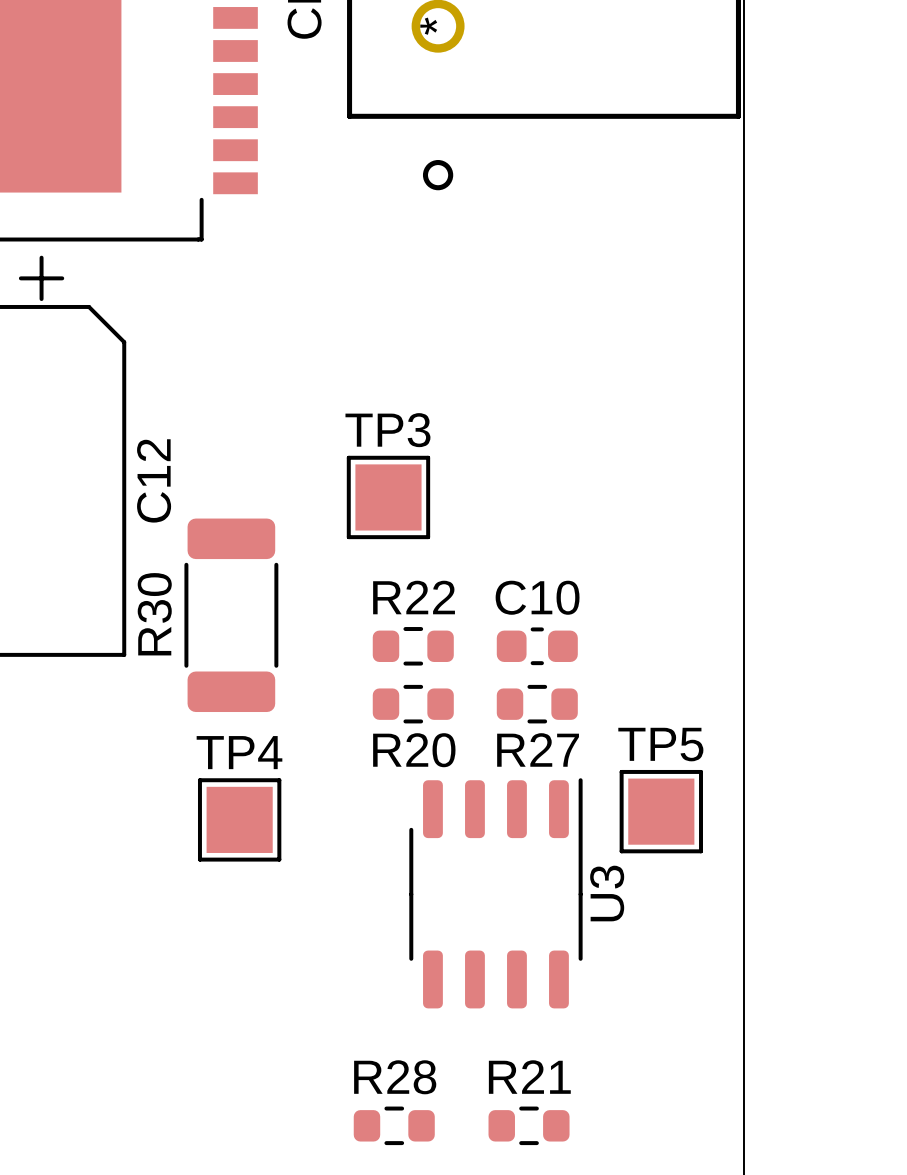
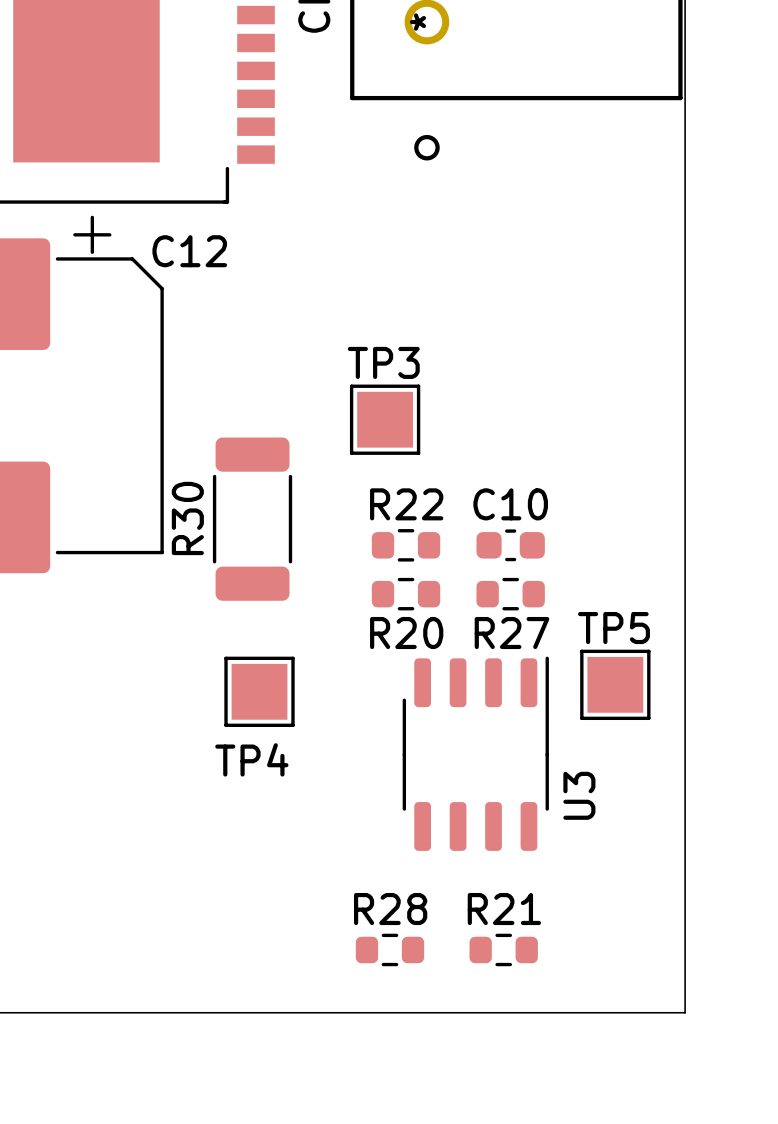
C12 name rotation: 0° (154, 480) -> 90° clockwise (189, 251)
C12 name position: C12 (154, 480) -> C12 (189, 251)
TP4 name position: TP4 (239, 752) -> TP4 (251, 759)
U3 name position: U3 (607, 893) -> U3 (579, 795)

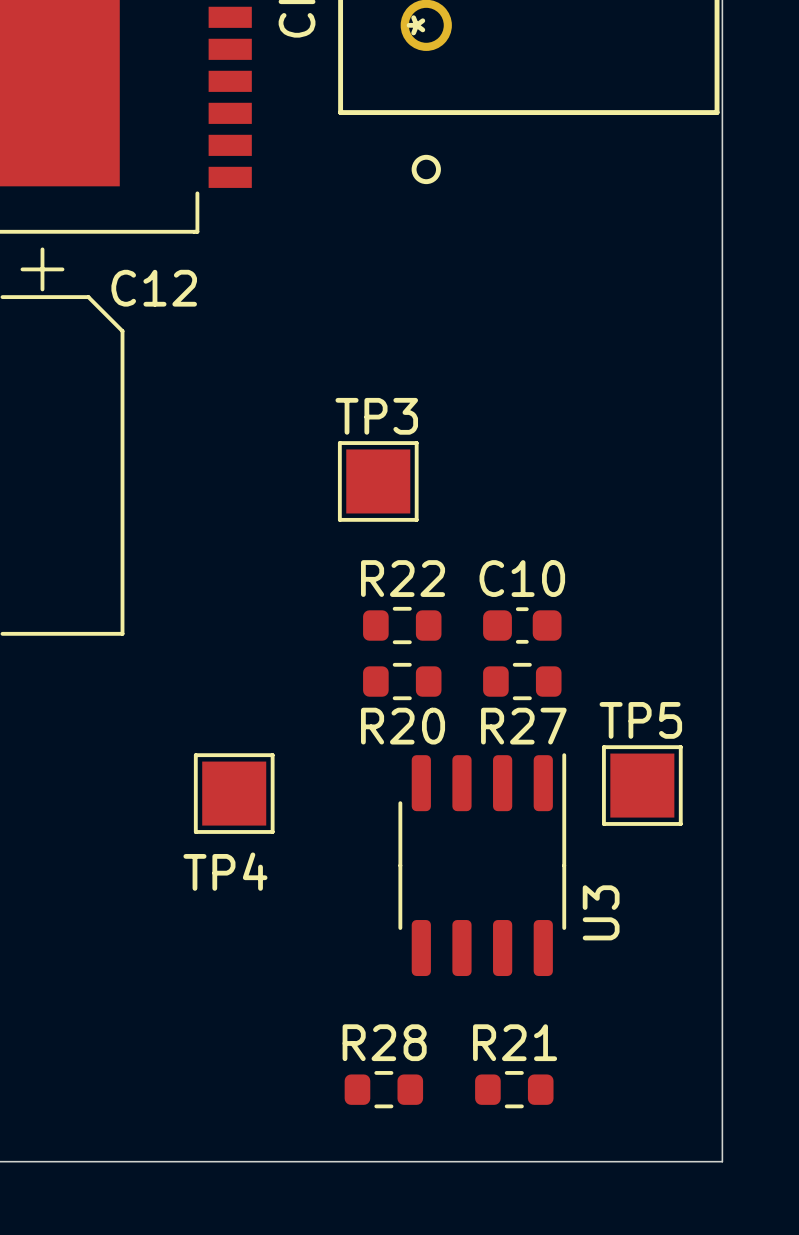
R30: (252, 519) -> none

